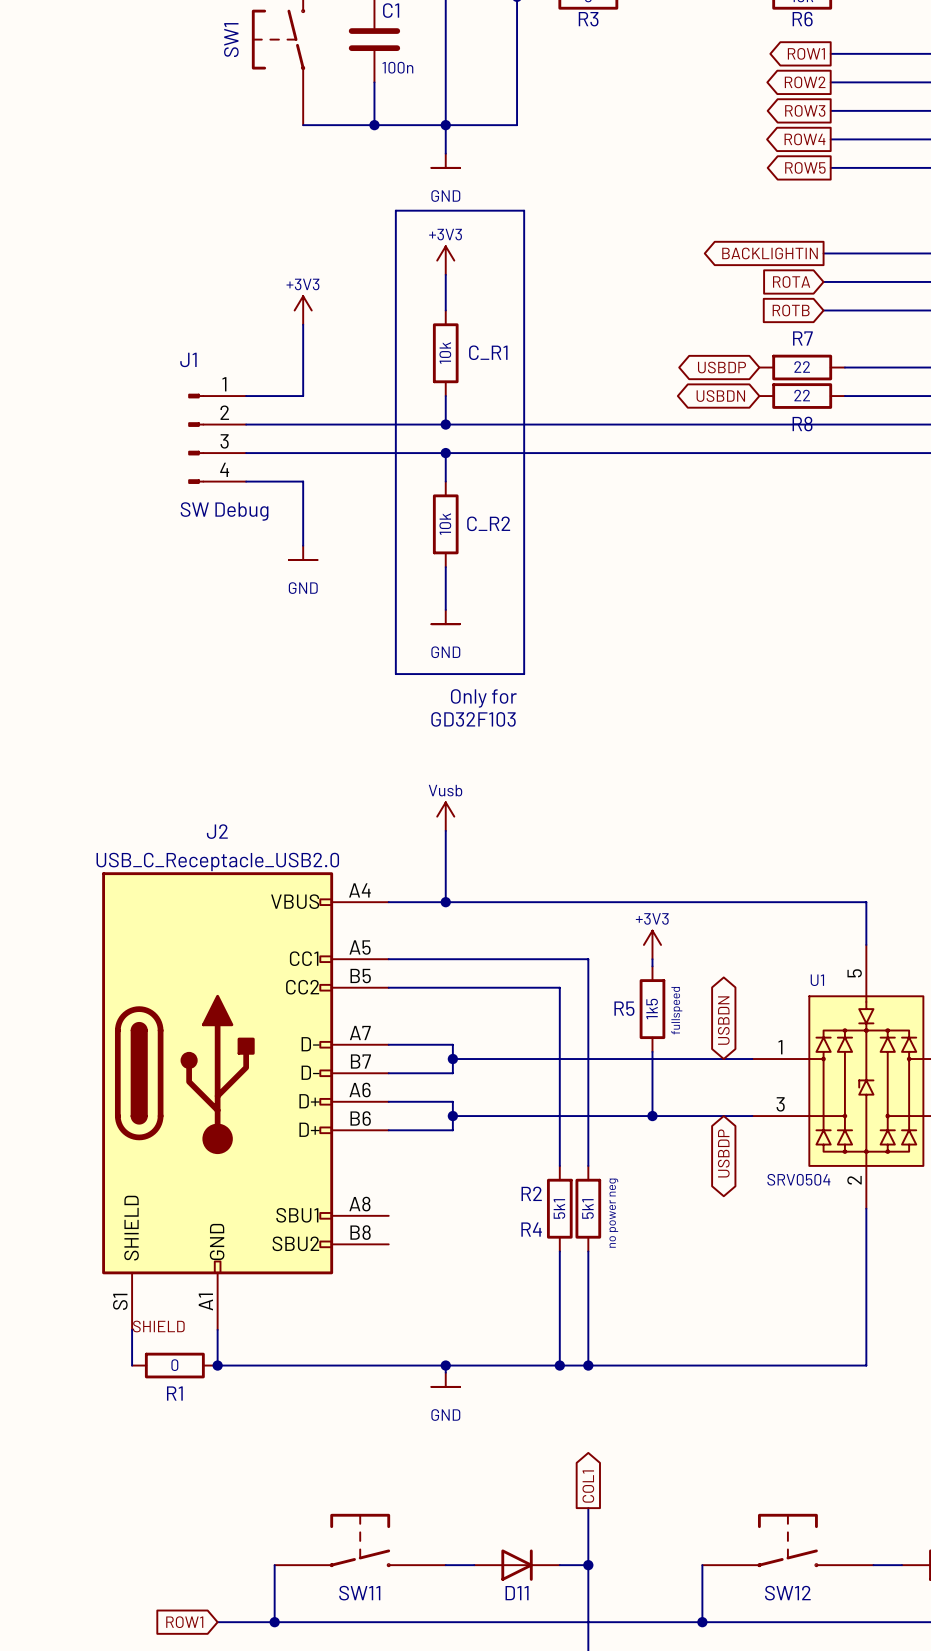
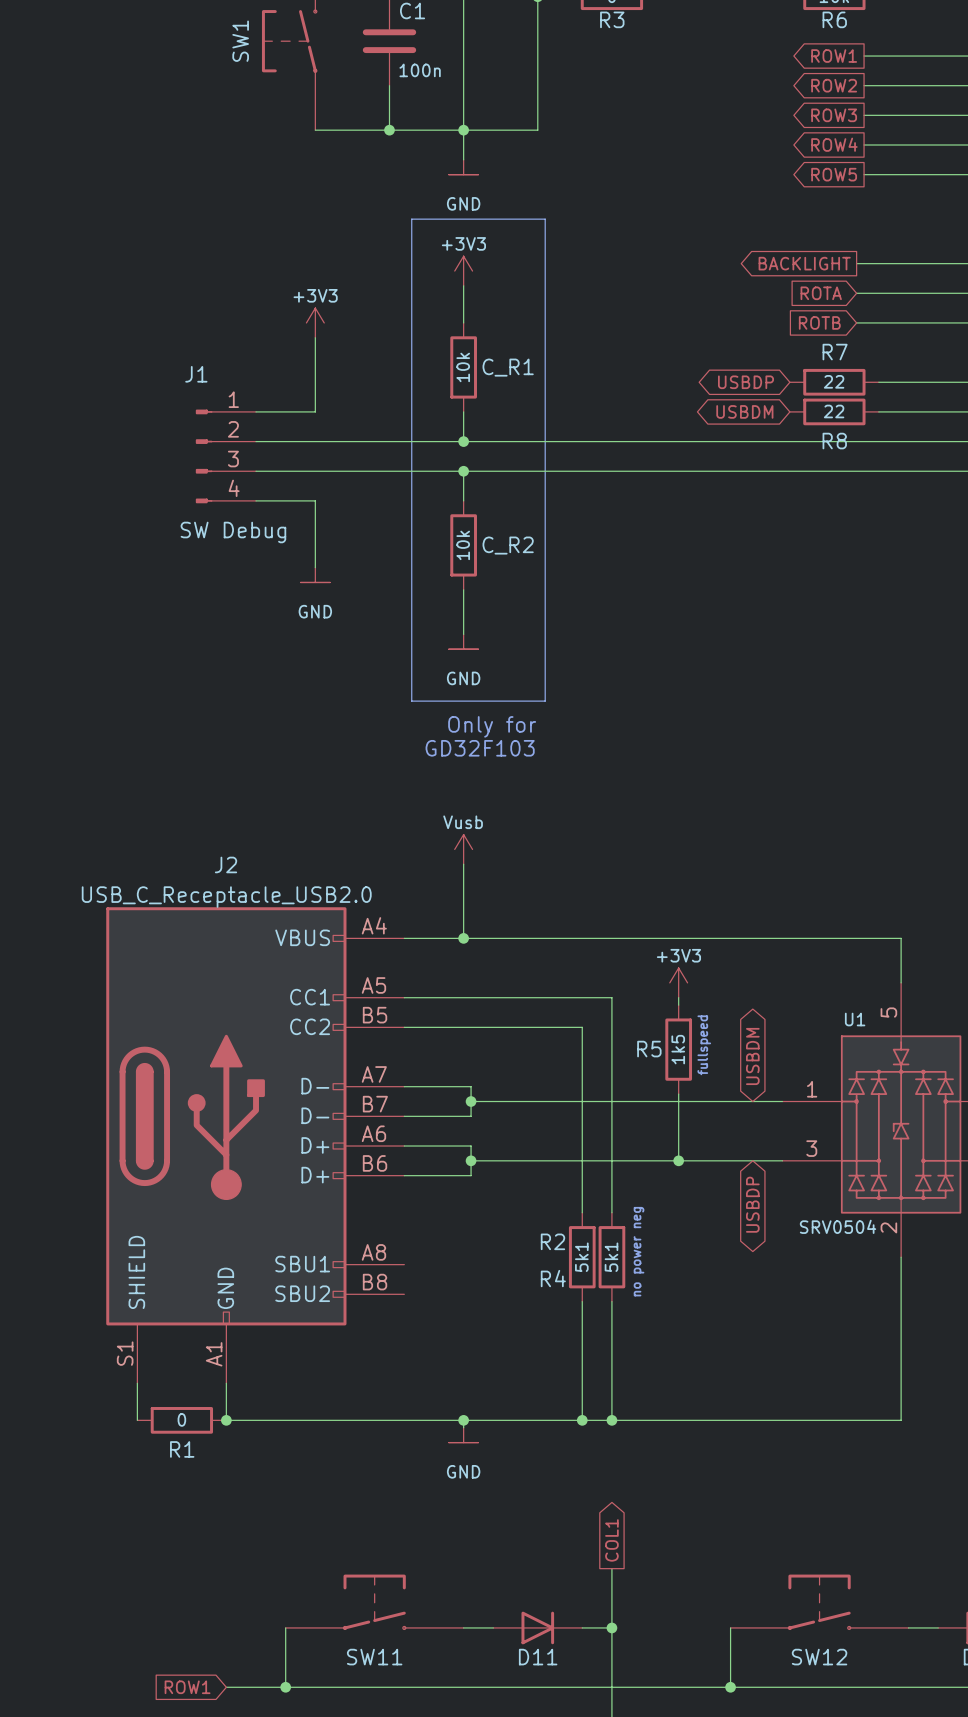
global label: BACKLIGHTIN (770, 253) -> BACKLIGHT (804, 263)
global label: USBDN (720, 396) -> USBDM (744, 411)
global label: USBDN (723, 1020) -> USBDM (752, 1056)
label: SHIELD (158, 1326) -> none

